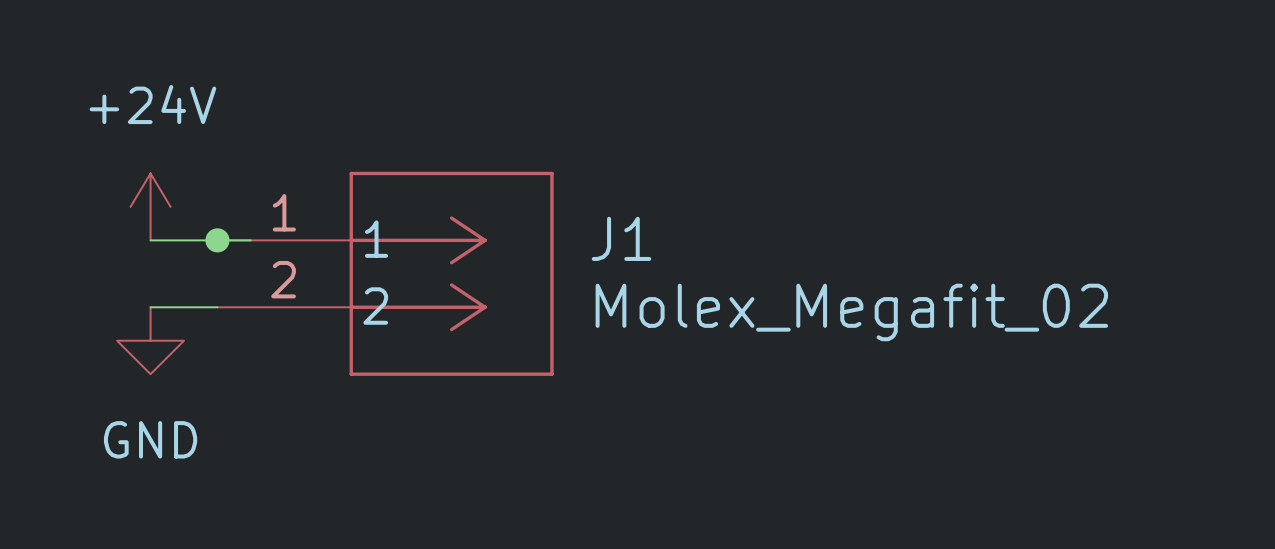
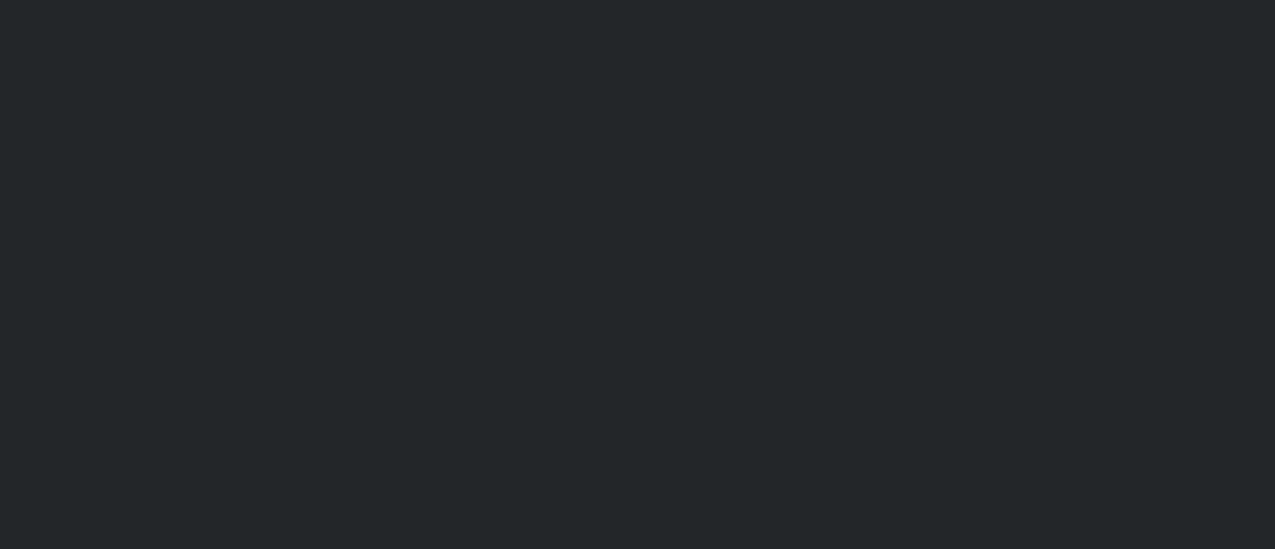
power symbol: +24V (150, 206) -> none
wire: (150, 240) (250, 240) -> none
junction: (217, 240) -> none
J1: Molex_Megafit_02 (385, 273) -> none
wire: (150, 307) (217, 307) -> none
power symbol: GND (150, 340) -> none

